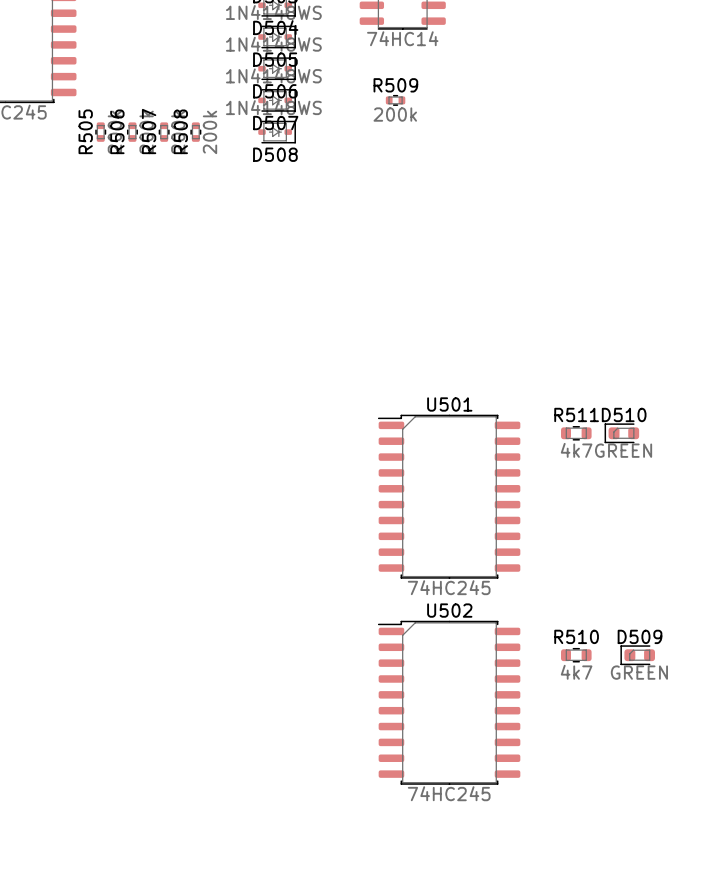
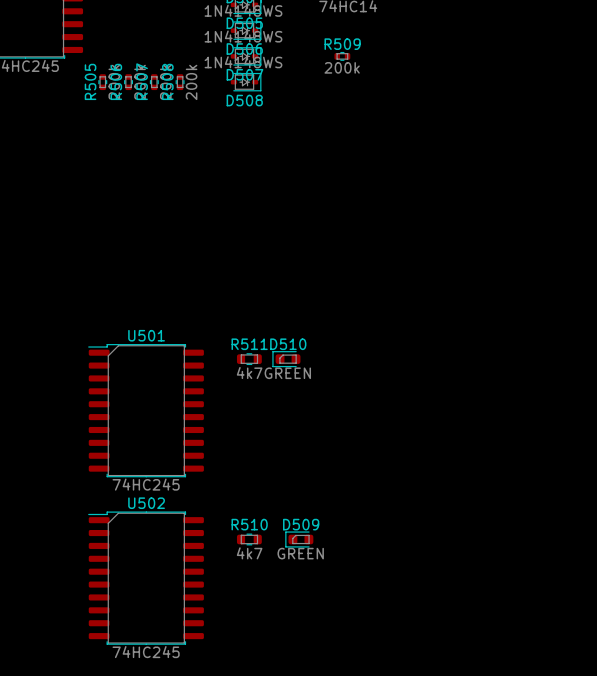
R511 position: (576, 433) -> (249, 359)
D510 position: (621, 433) -> (286, 359)
U501 position: (449, 496) -> (146, 410)
R510 position: (576, 655) -> (249, 539)
D509 position: (637, 655) -> (299, 539)
U502 position: (449, 702) -> (146, 578)

